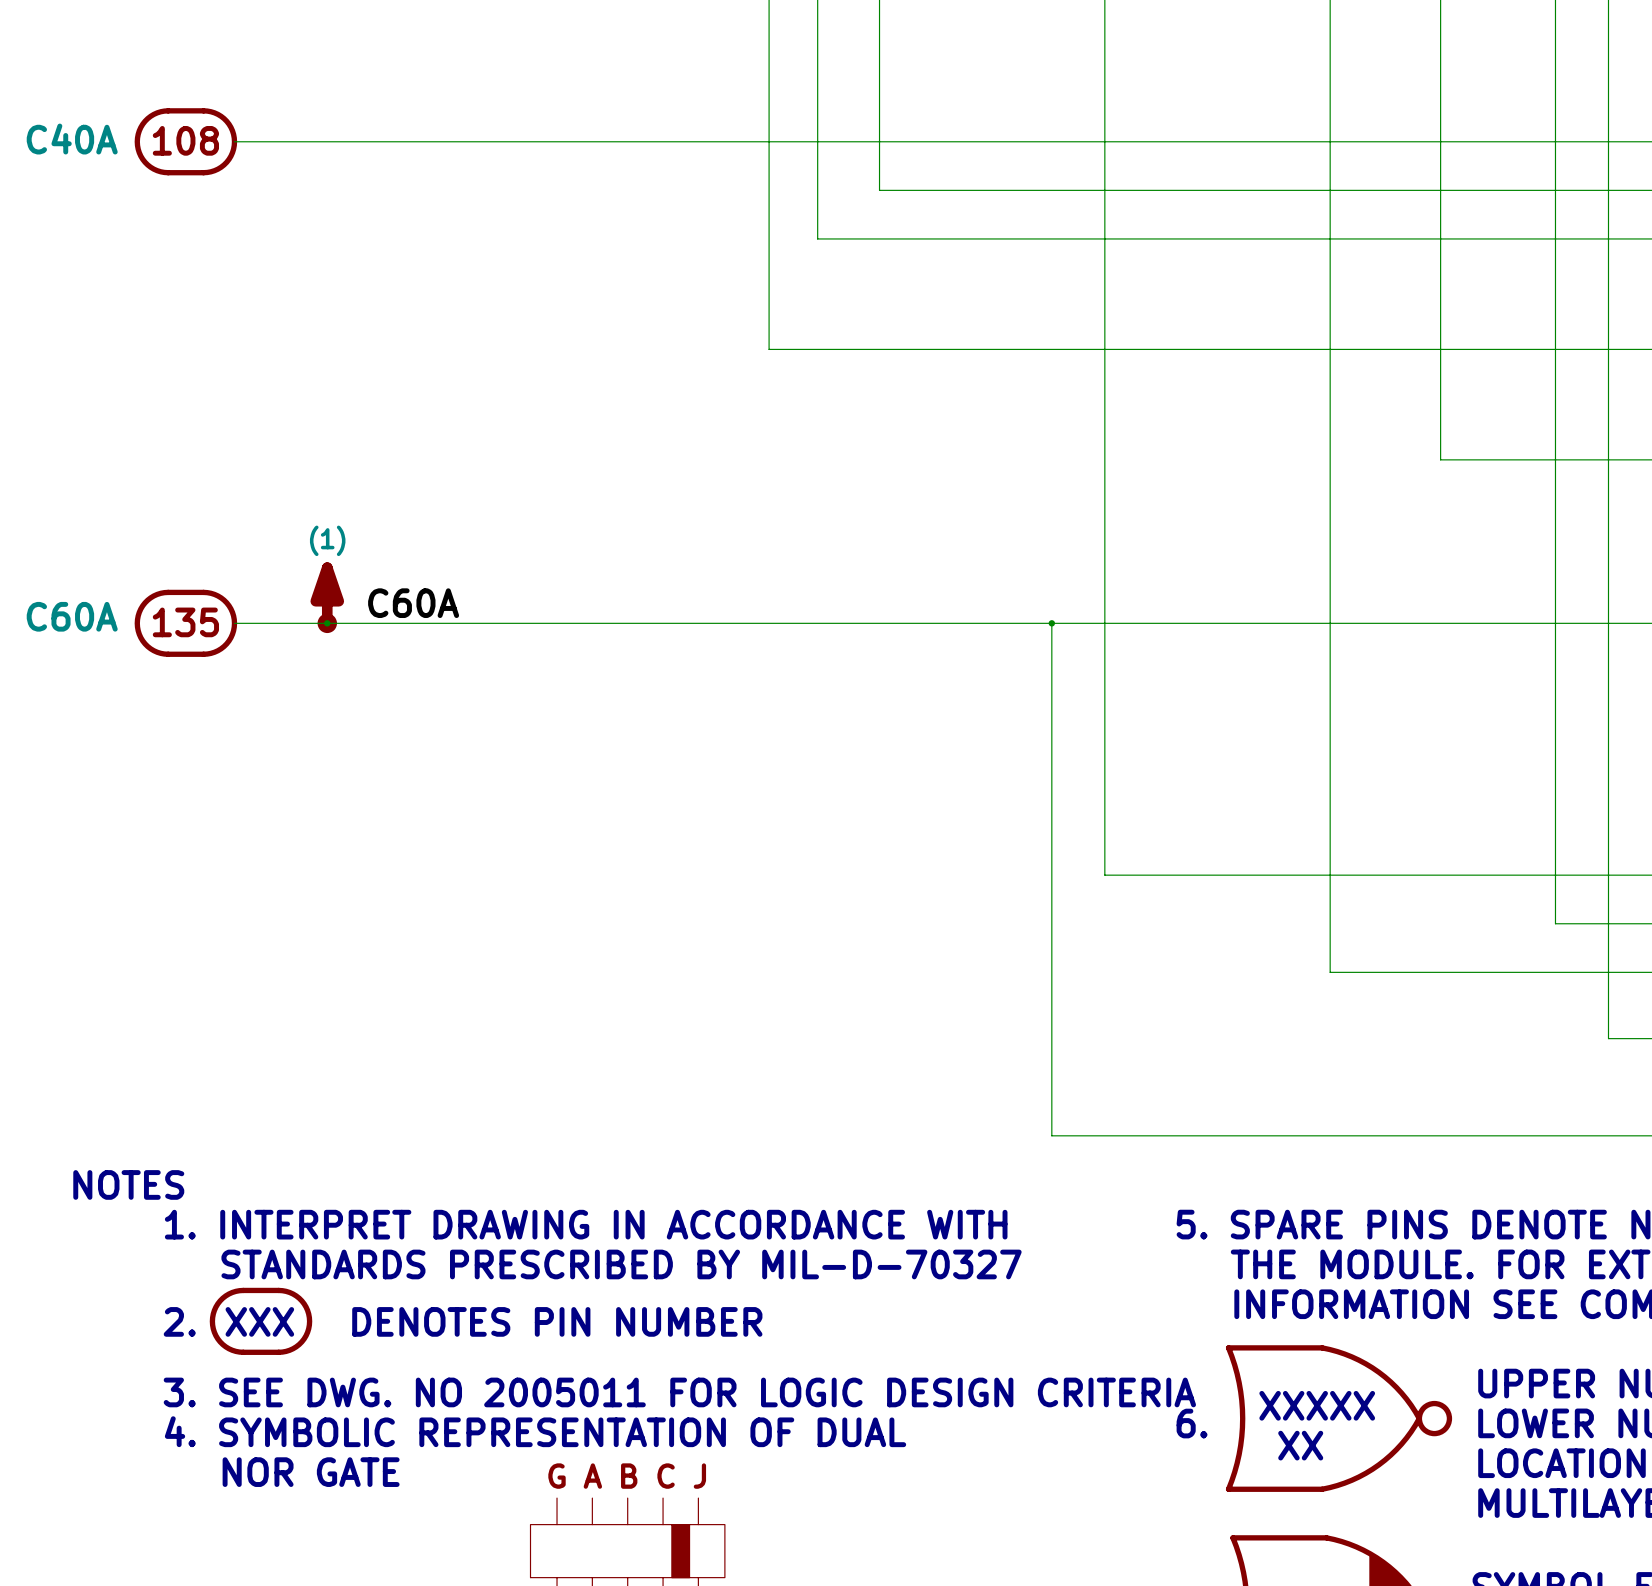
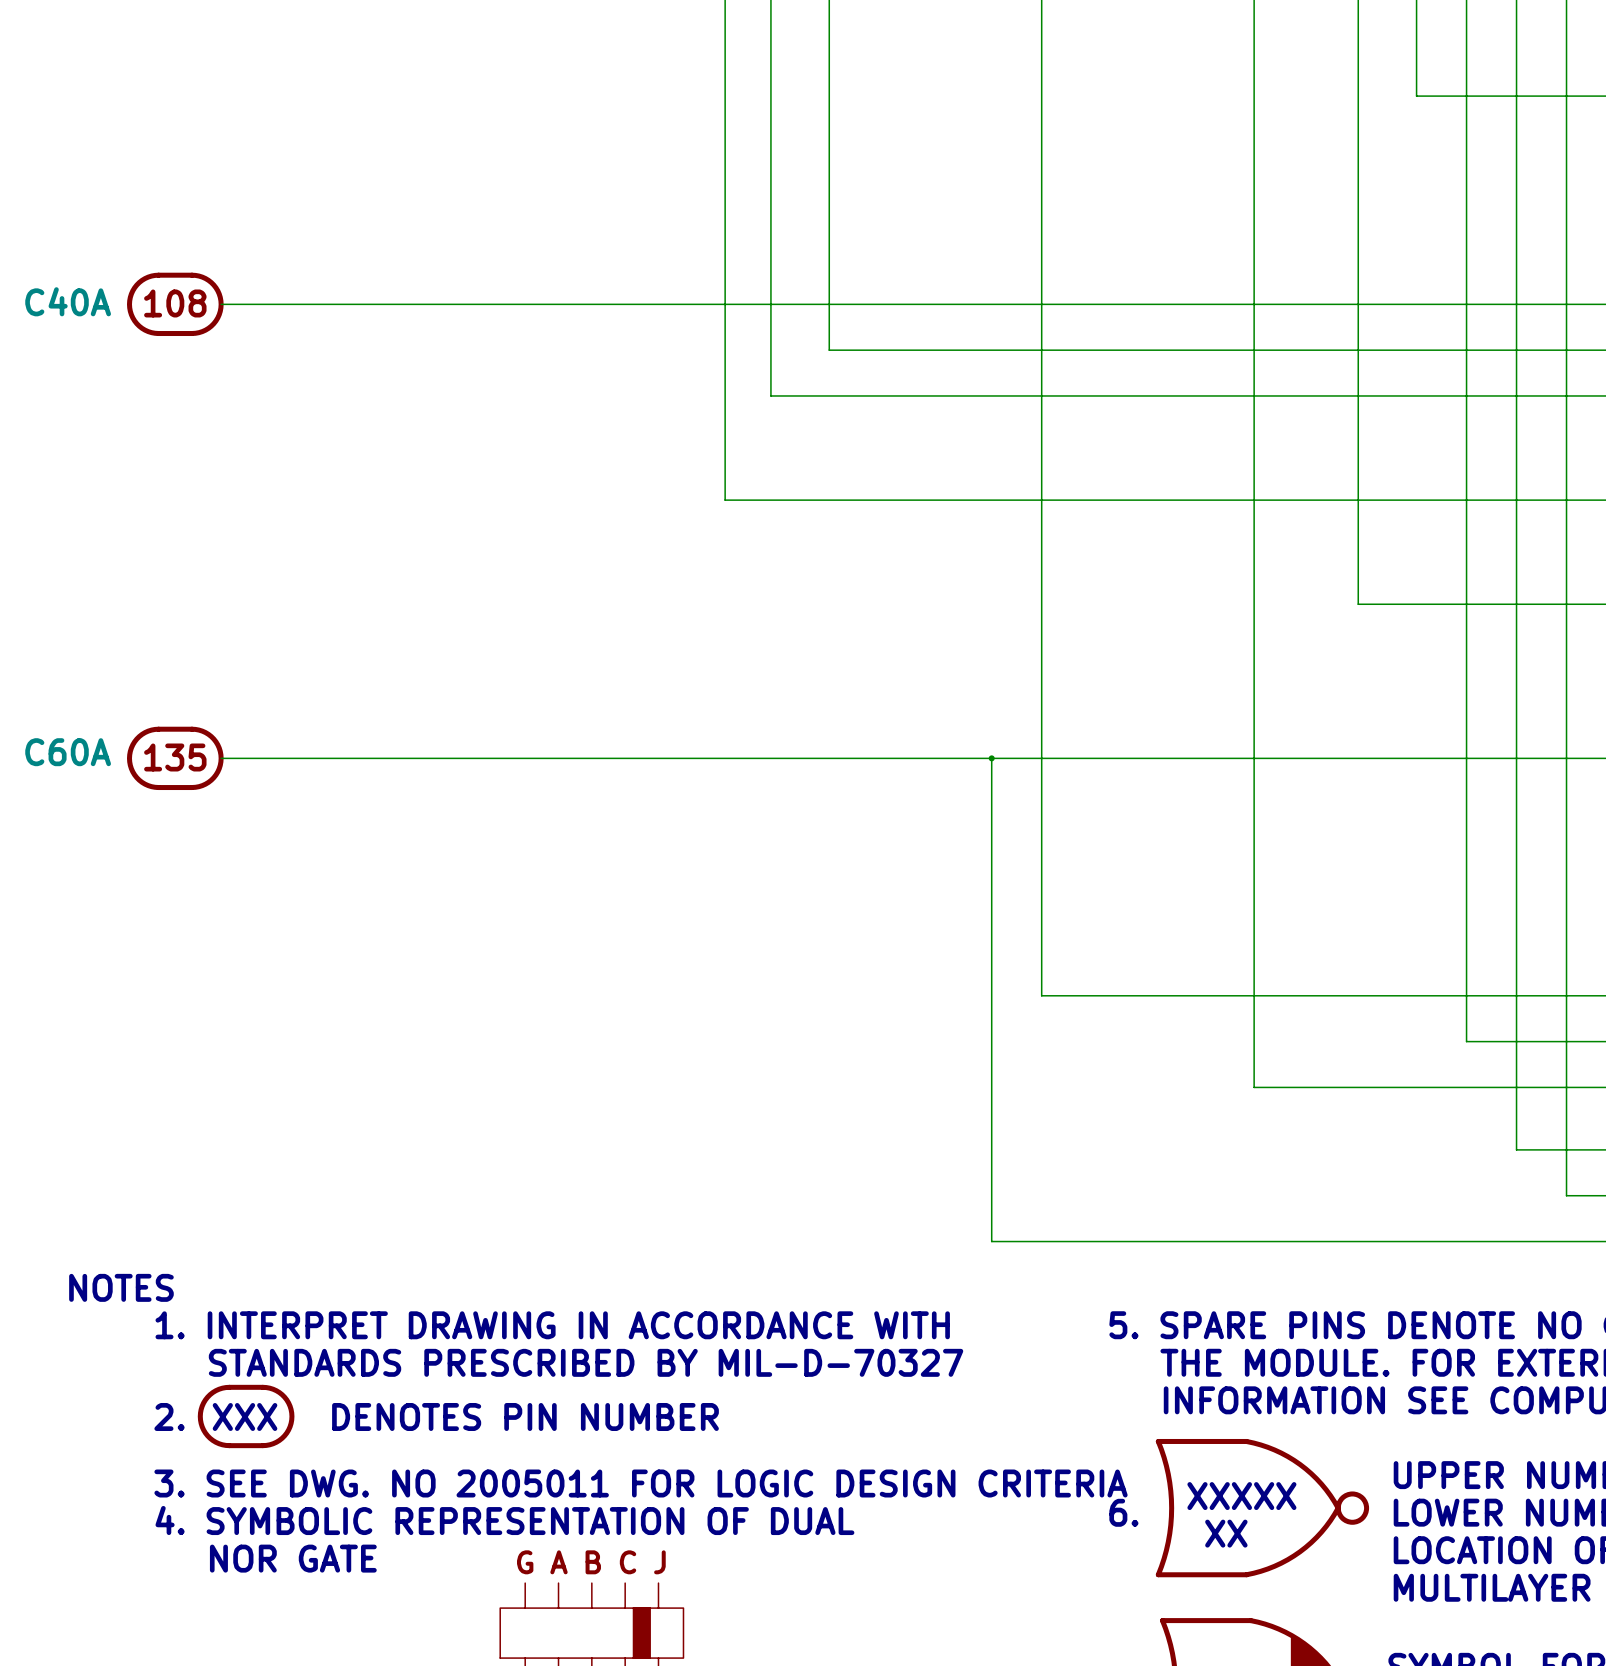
part: (327, 597) -> none
label: C60A (413, 603) -> none
junction: (327, 623) -> none

